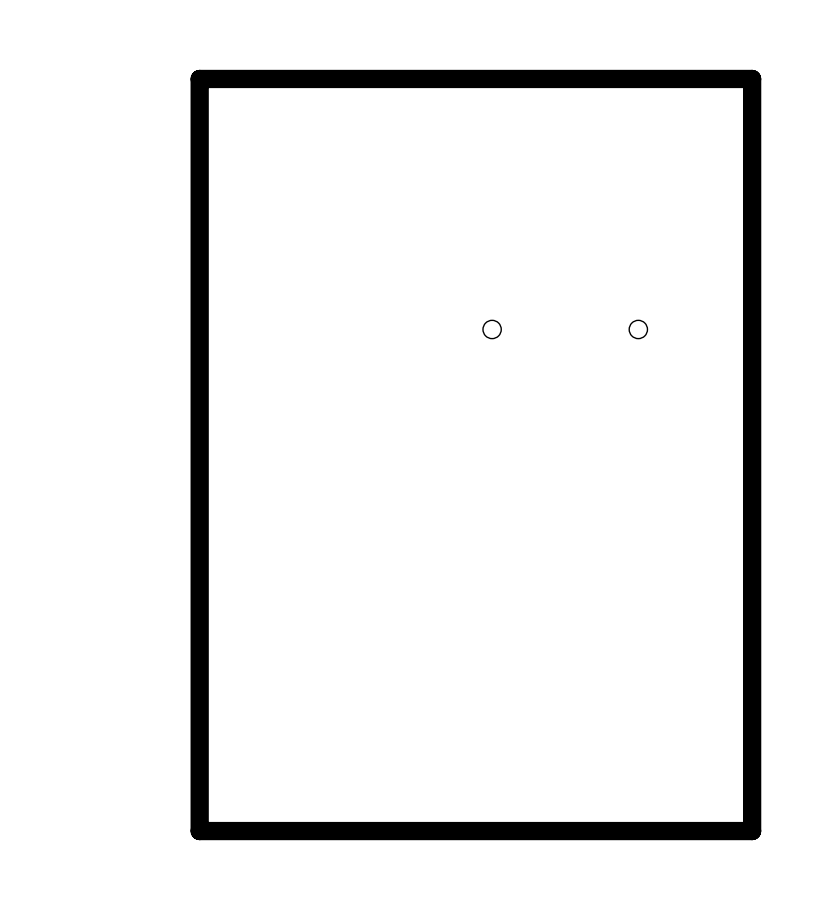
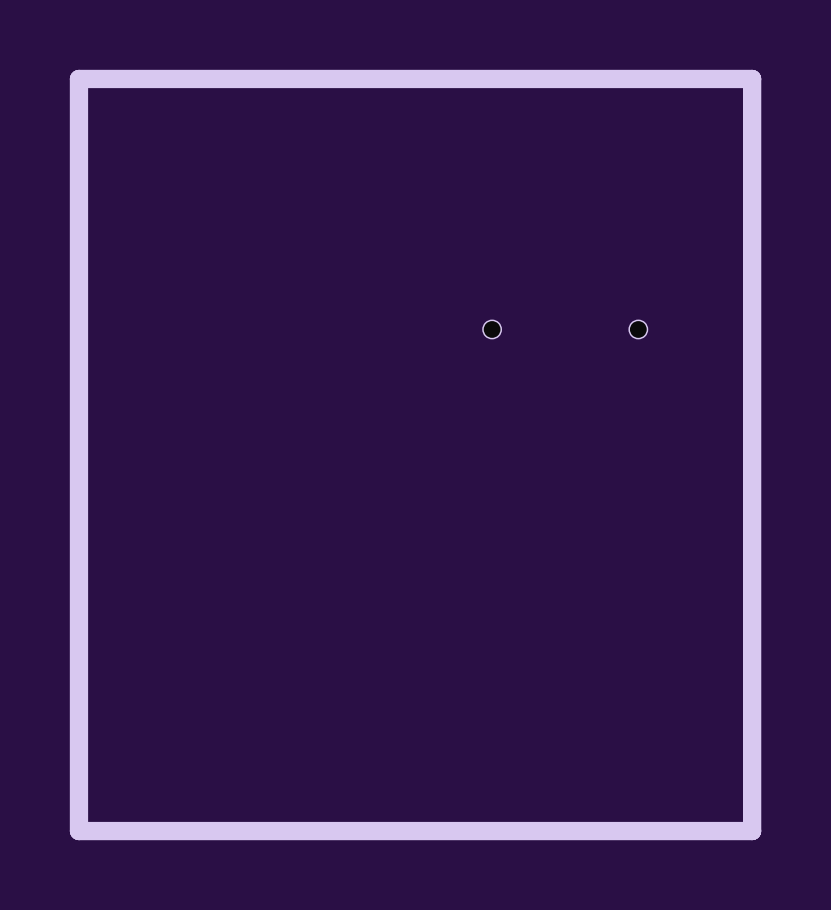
board edge: (199, 78) (199, 831) -> (199, 78) (78, 78) (78, 831) (199, 831)

